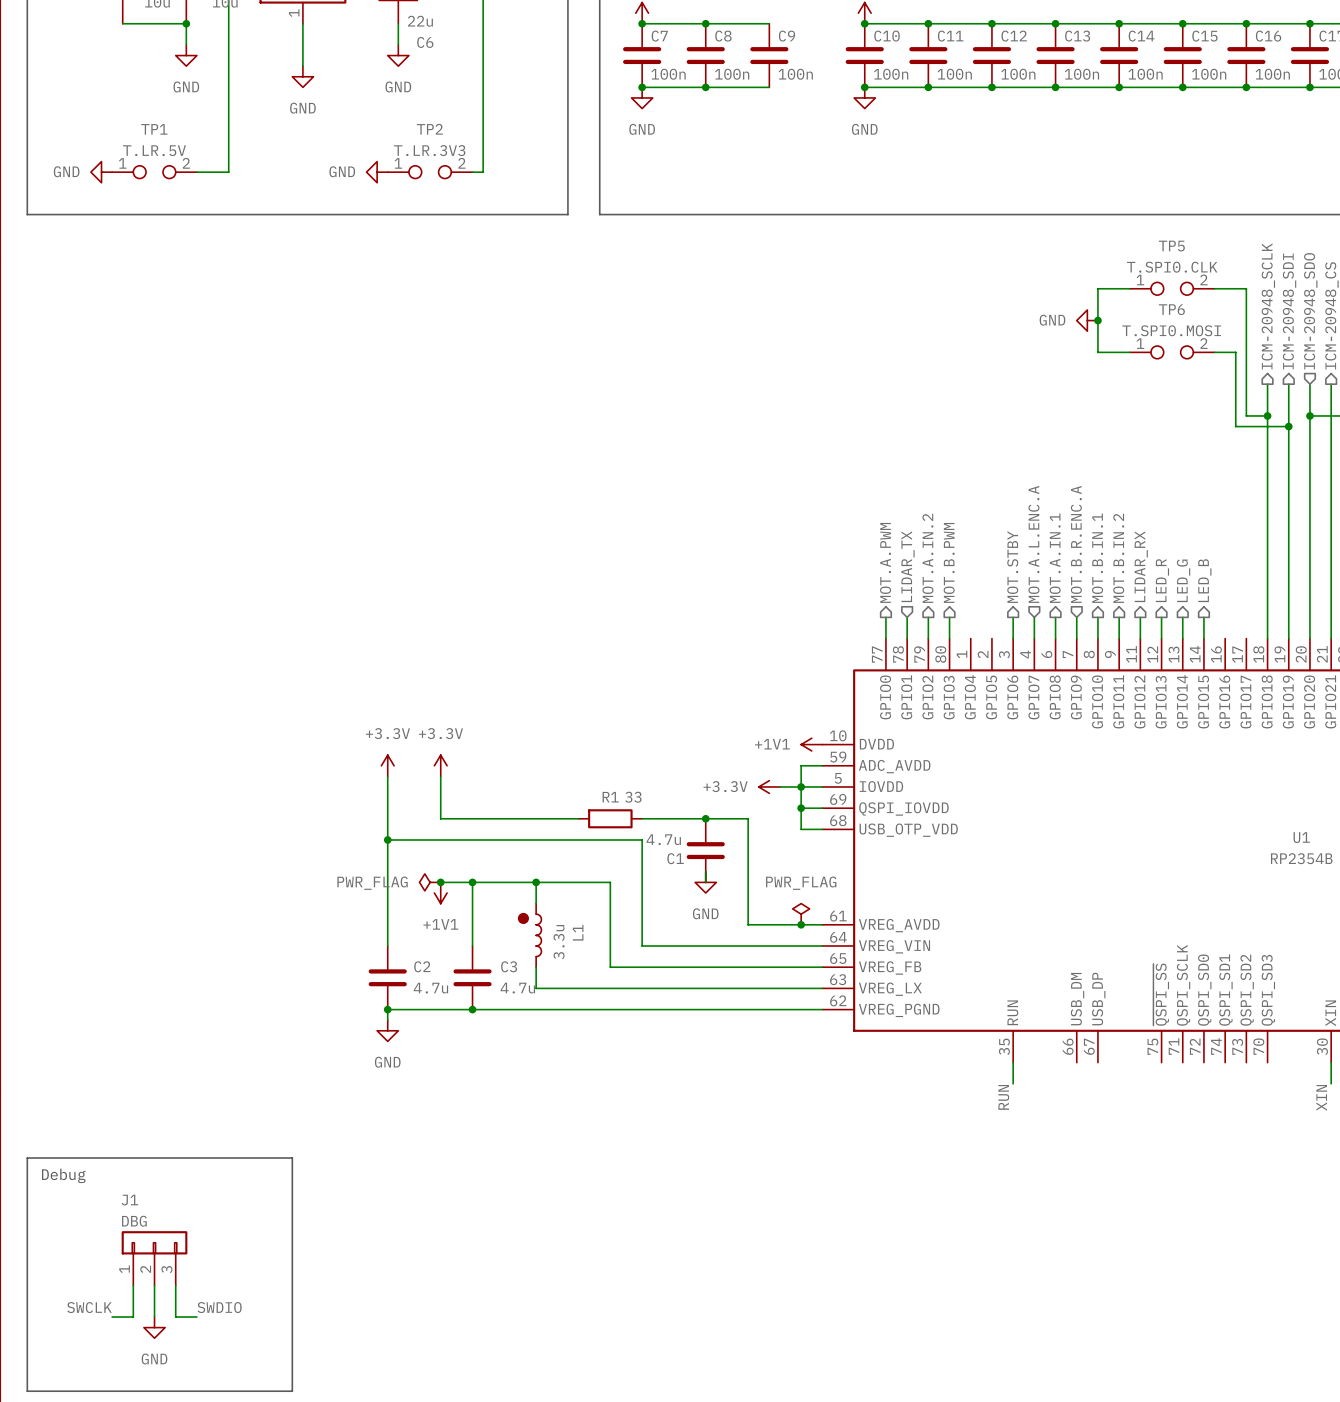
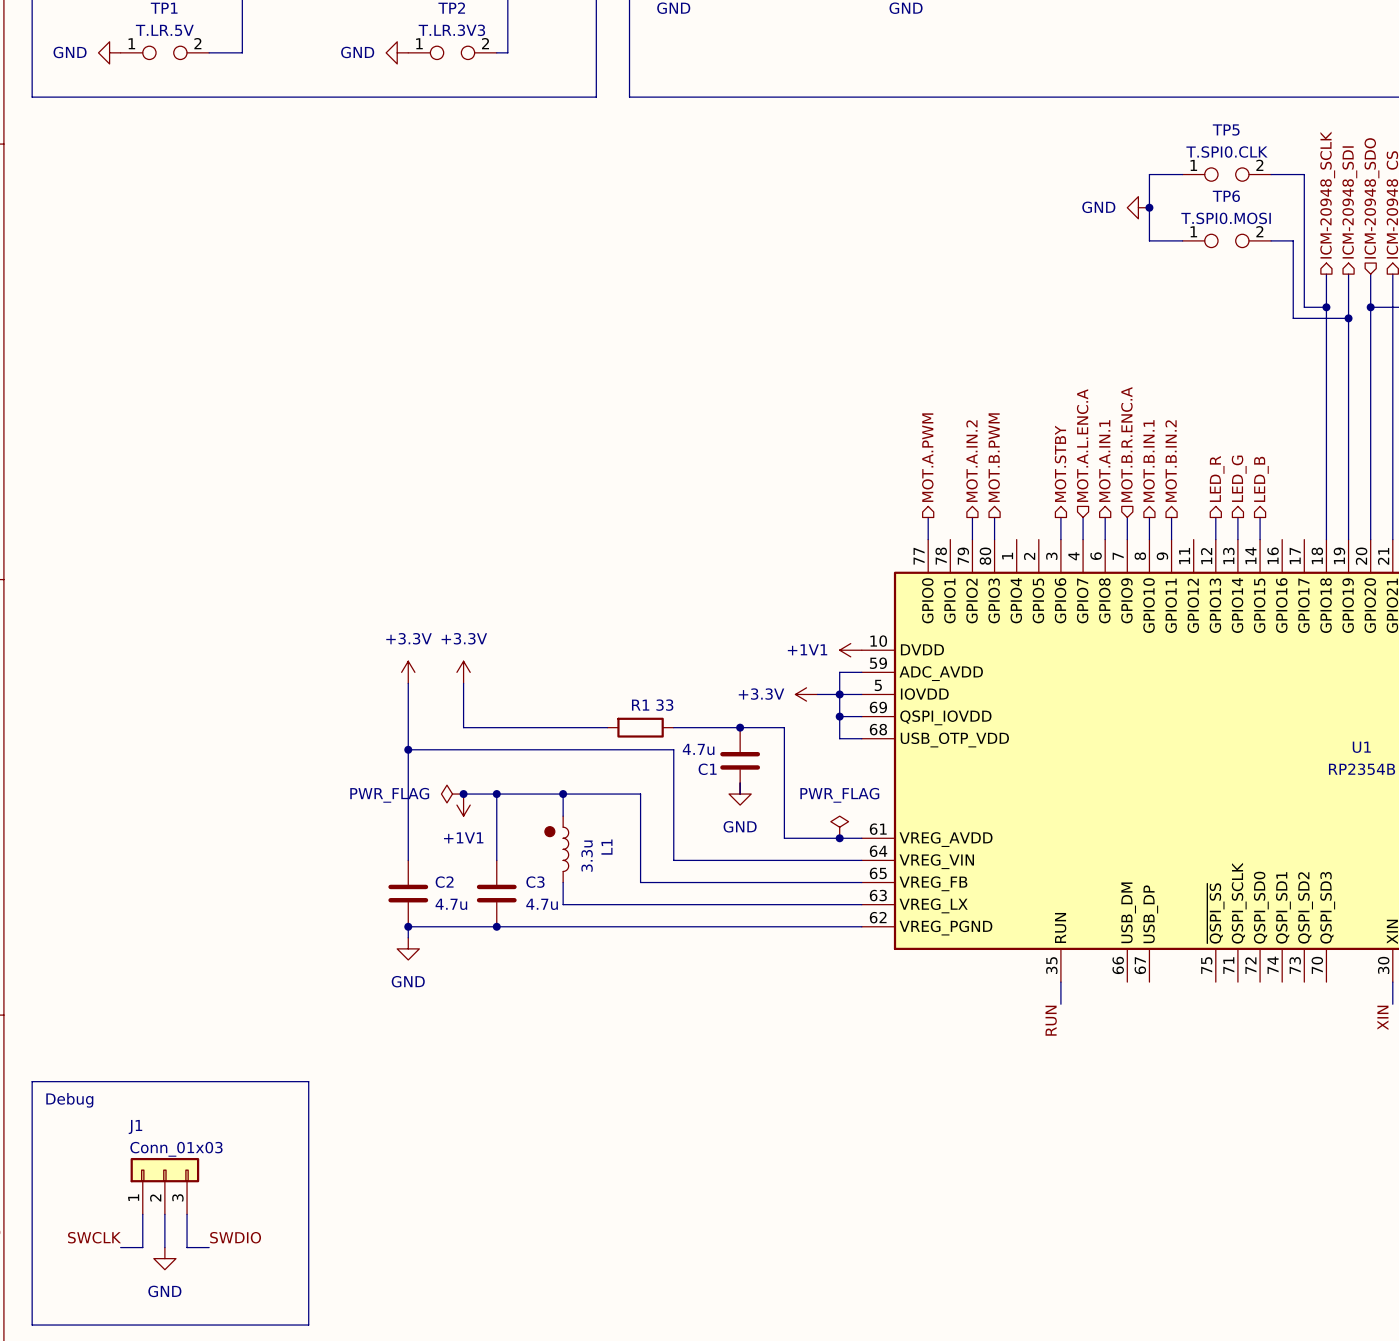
hierarchical label: LIDAR_TX (908, 566) -> none
hierarchical label: LIDAR_RX (1141, 566) -> none
wire: (907, 617) (907, 638) -> none
wire: (1140, 617) (1140, 638) -> none
J1 value: DBG (134, 1221) -> Conn_01x03 (176, 1149)

